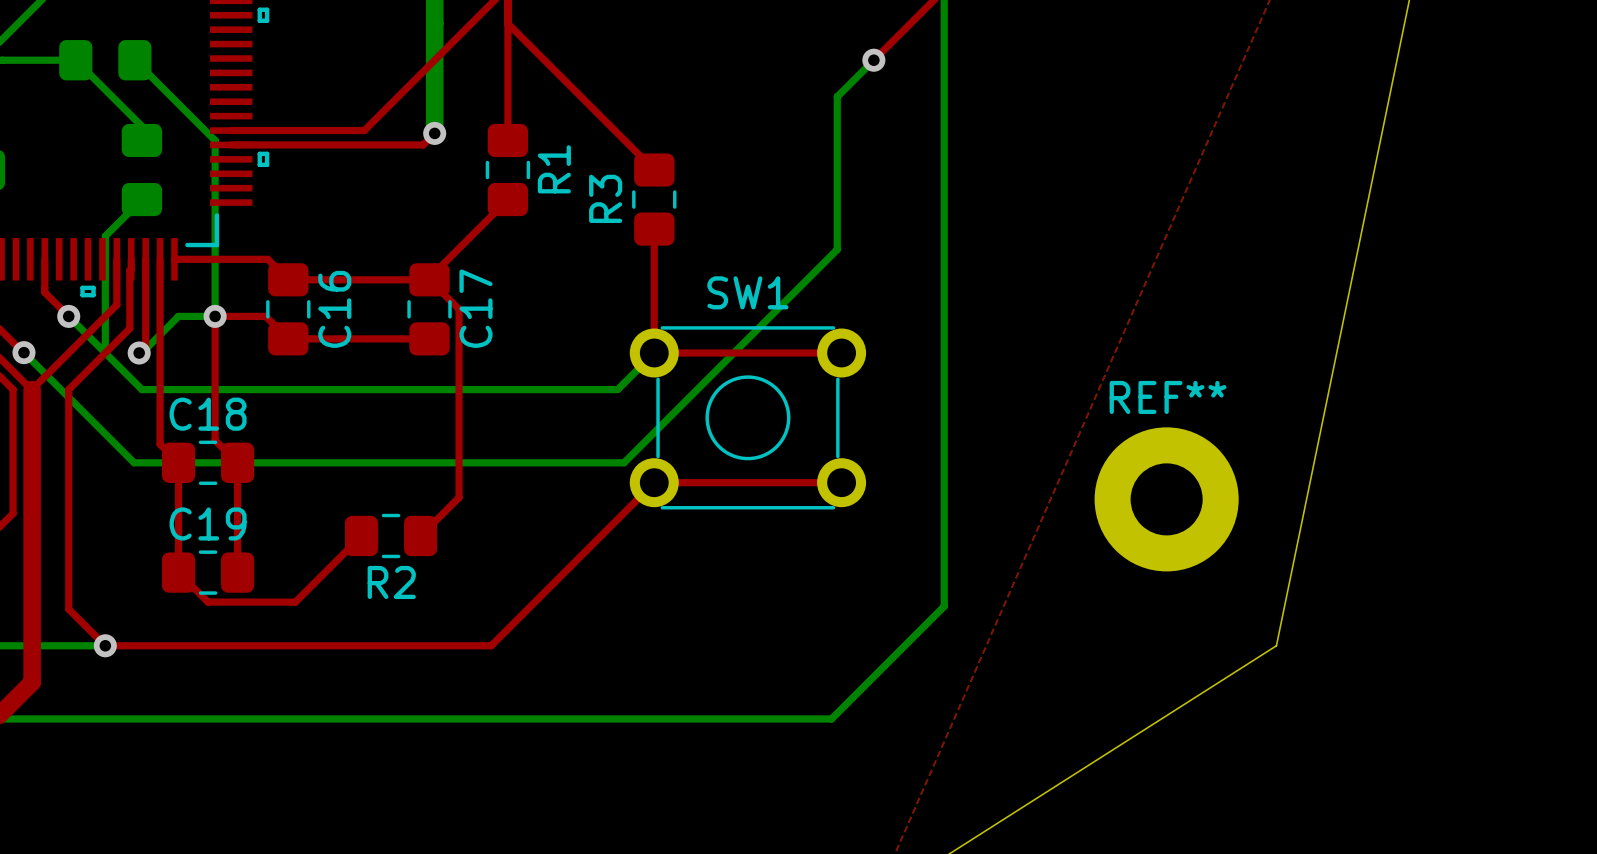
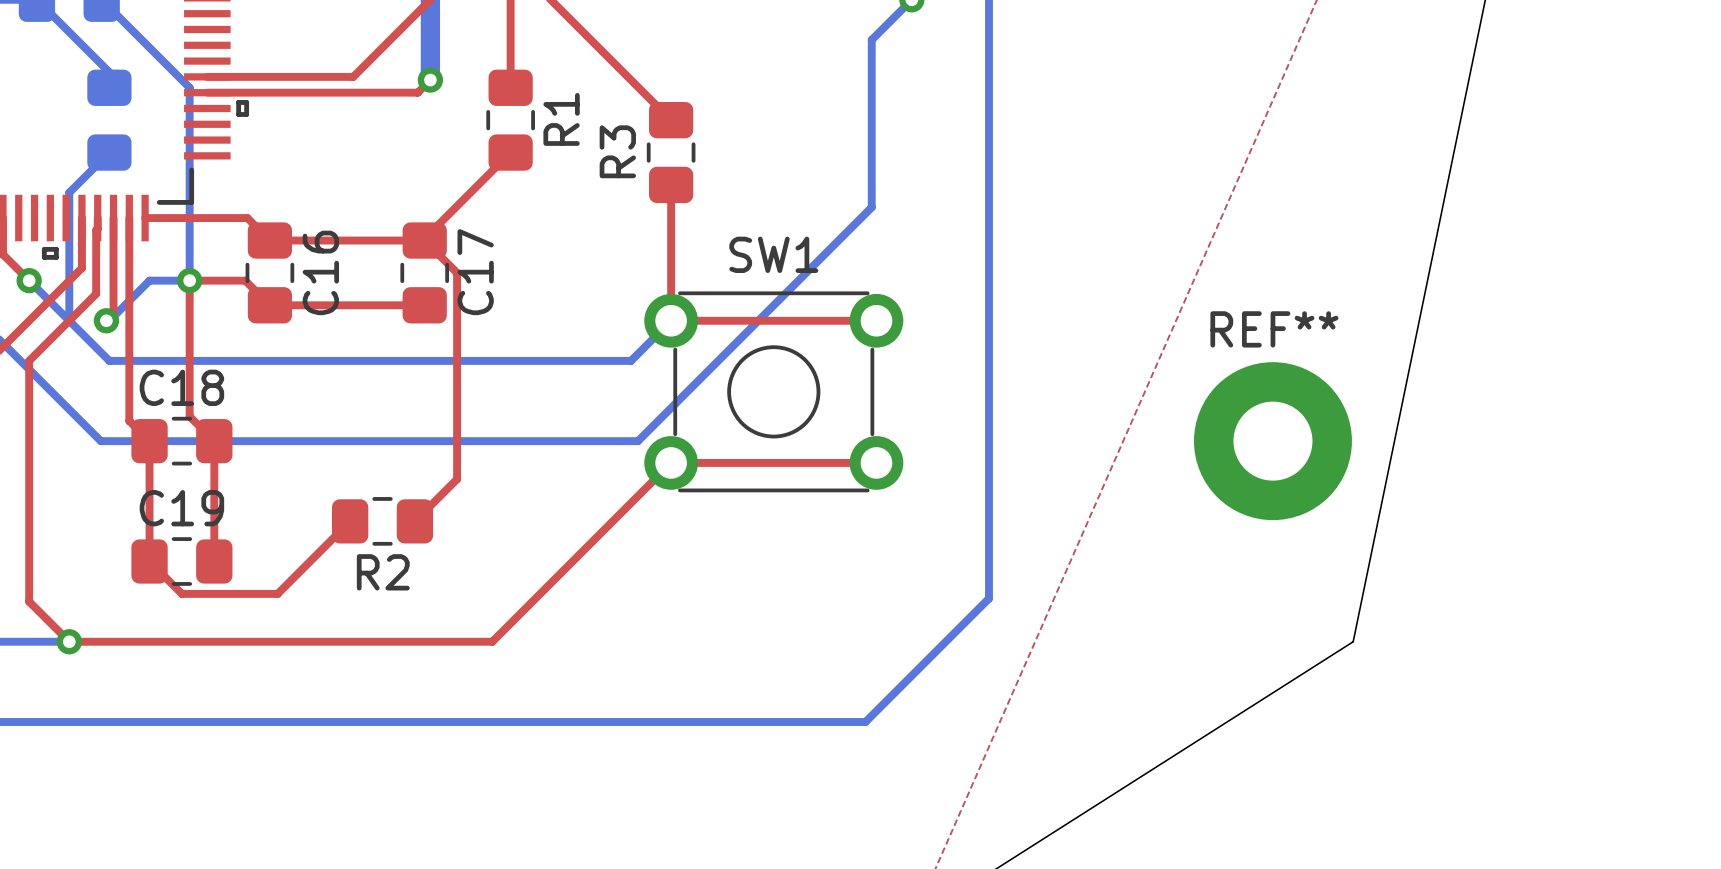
REF** position: (1166, 499) -> (1272, 441)

